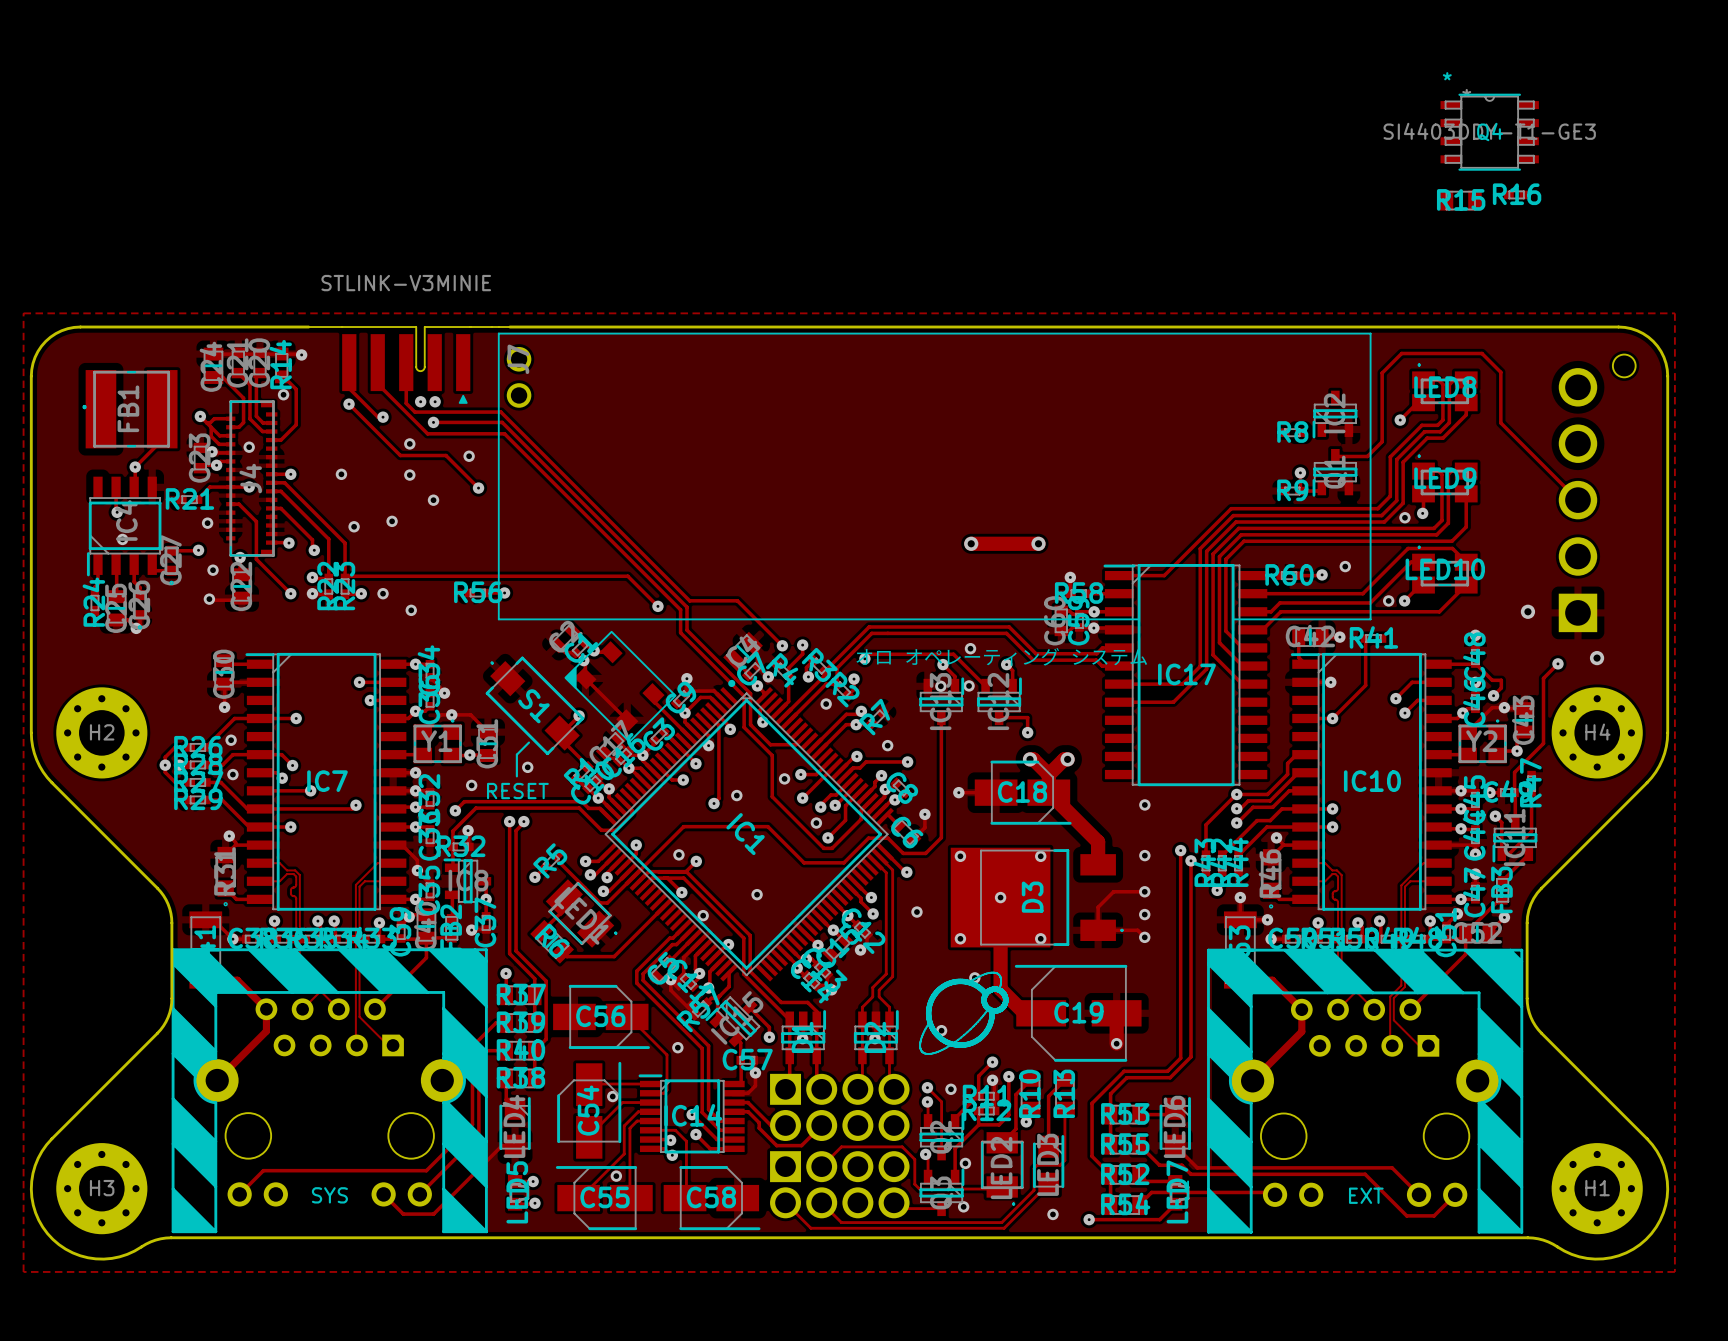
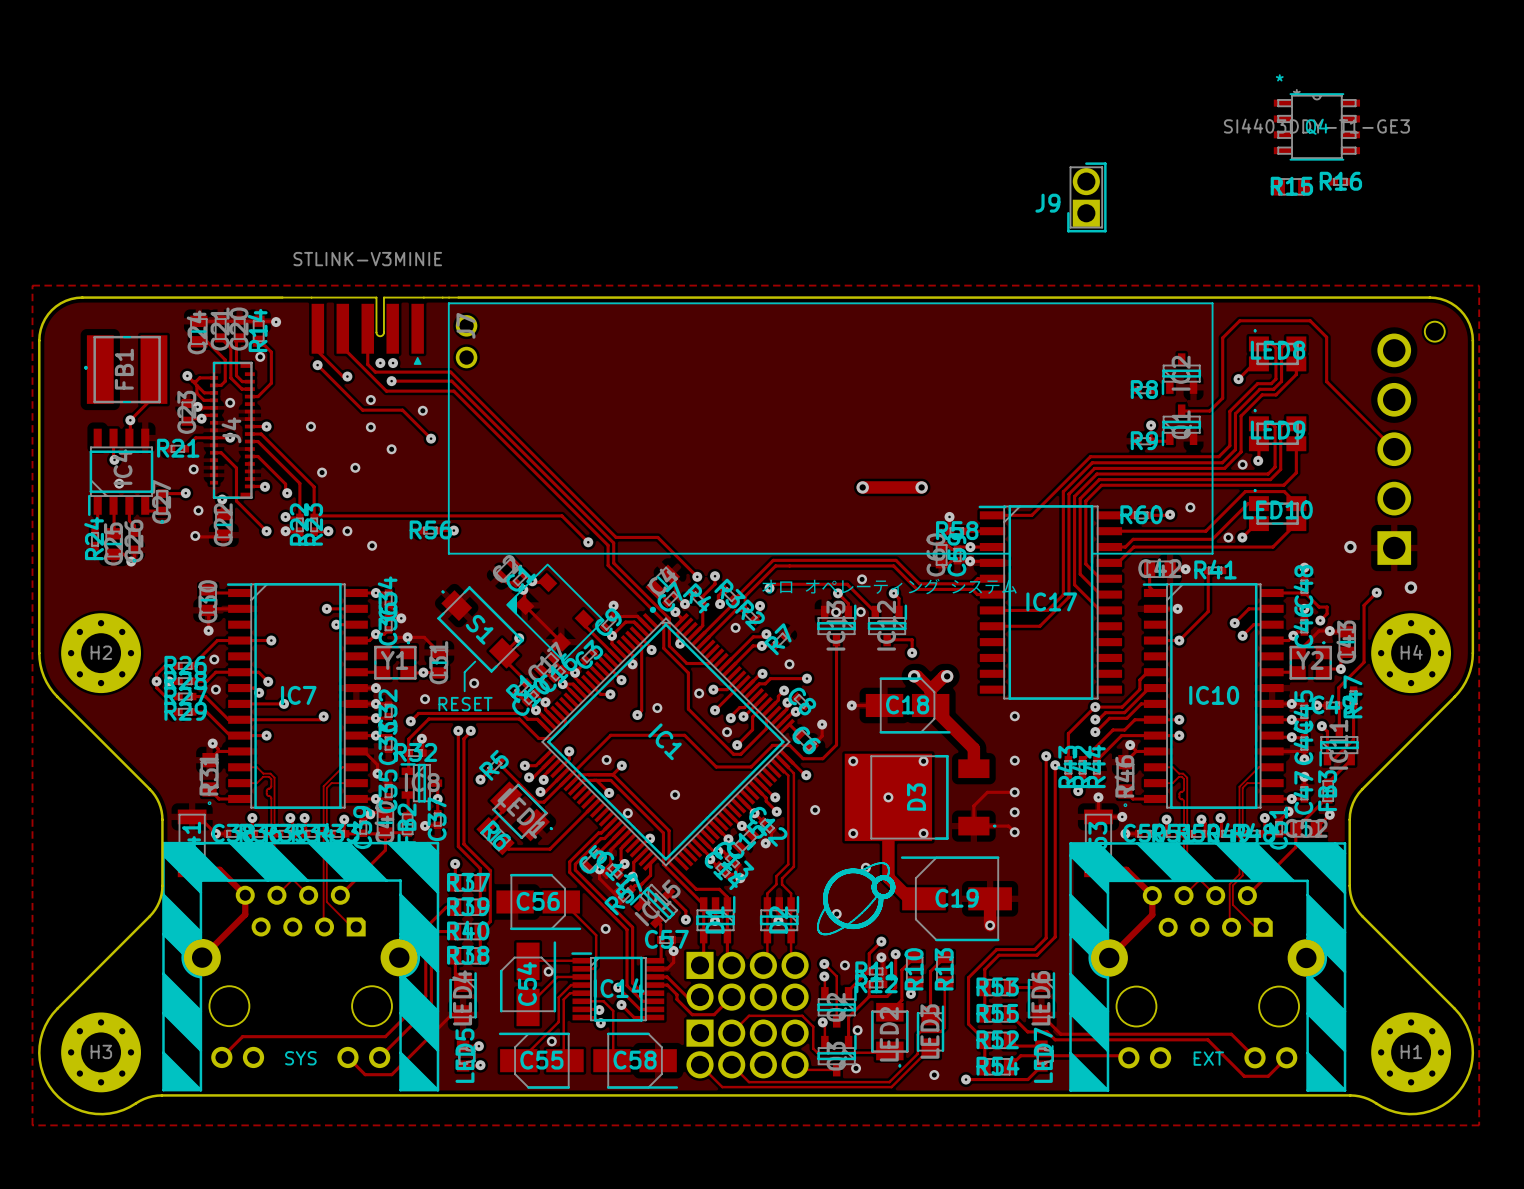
J9: none -> (1086, 197)

